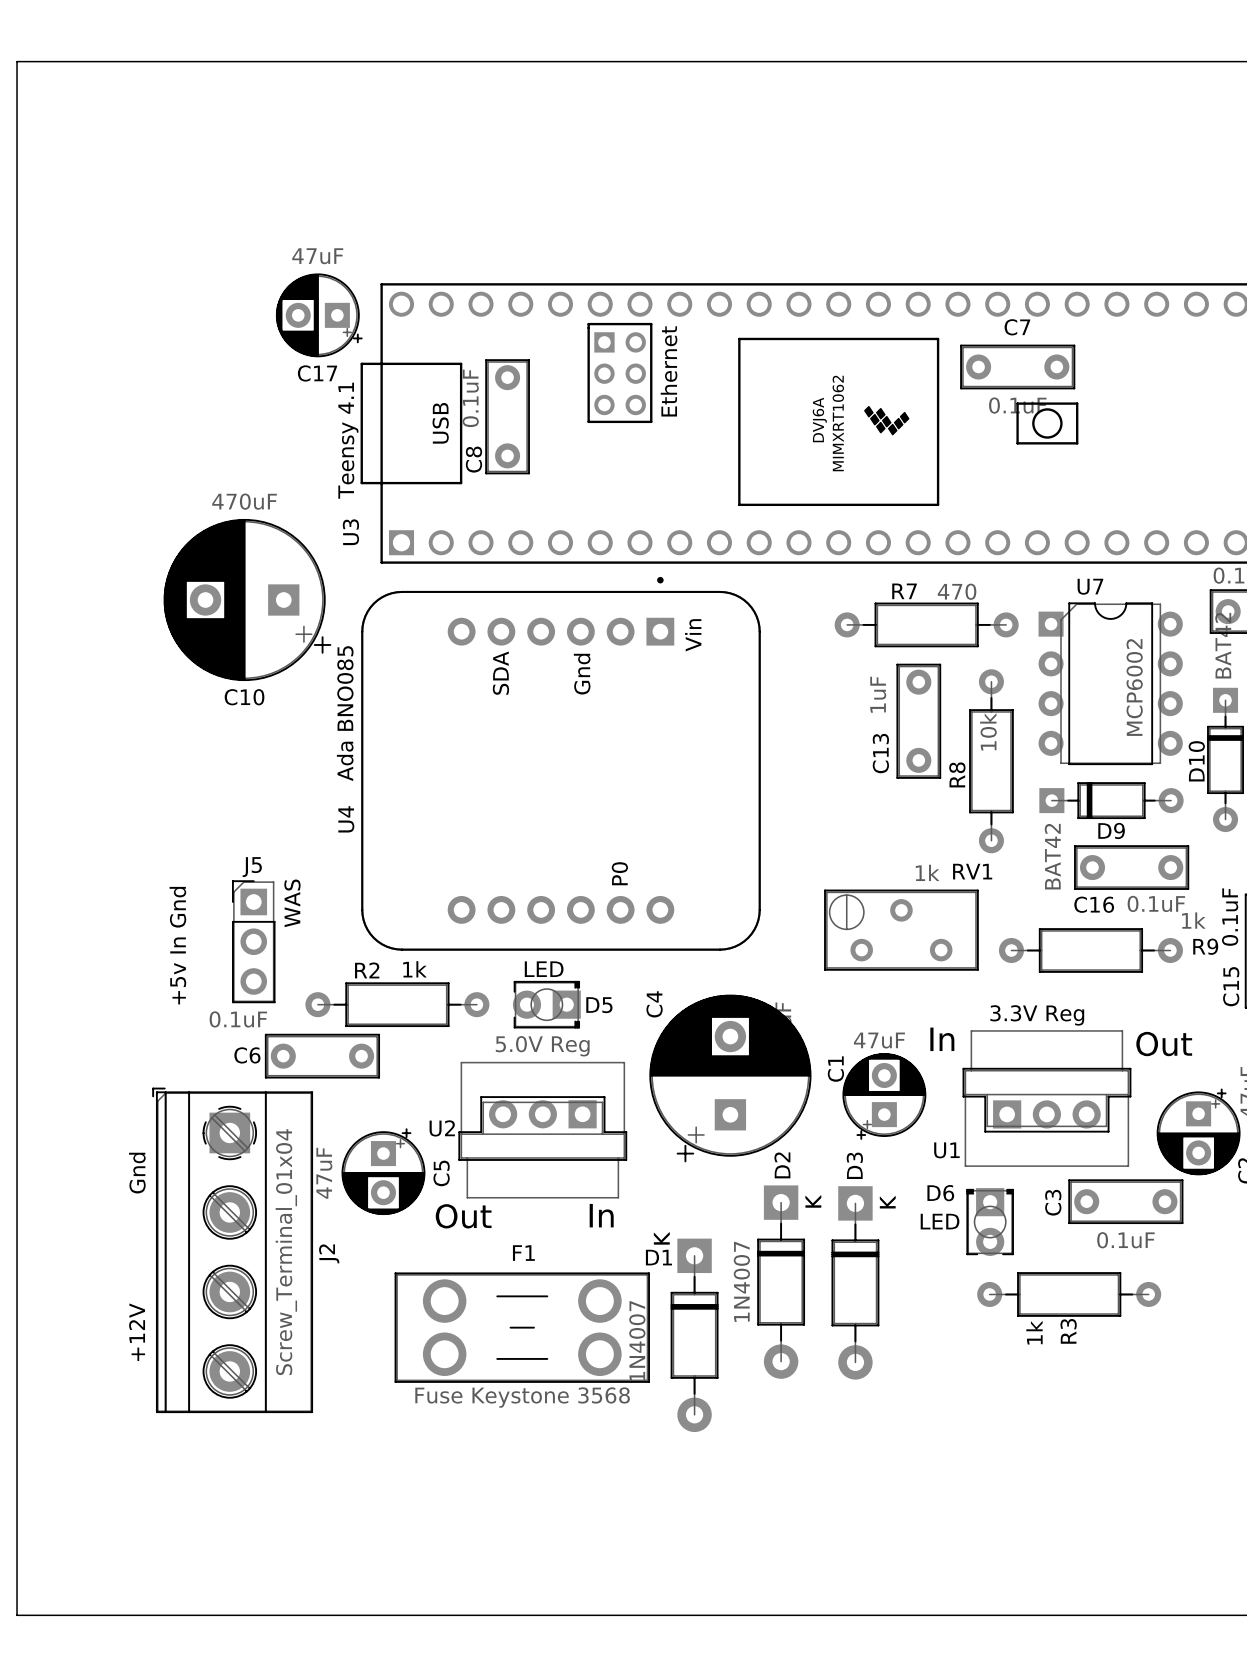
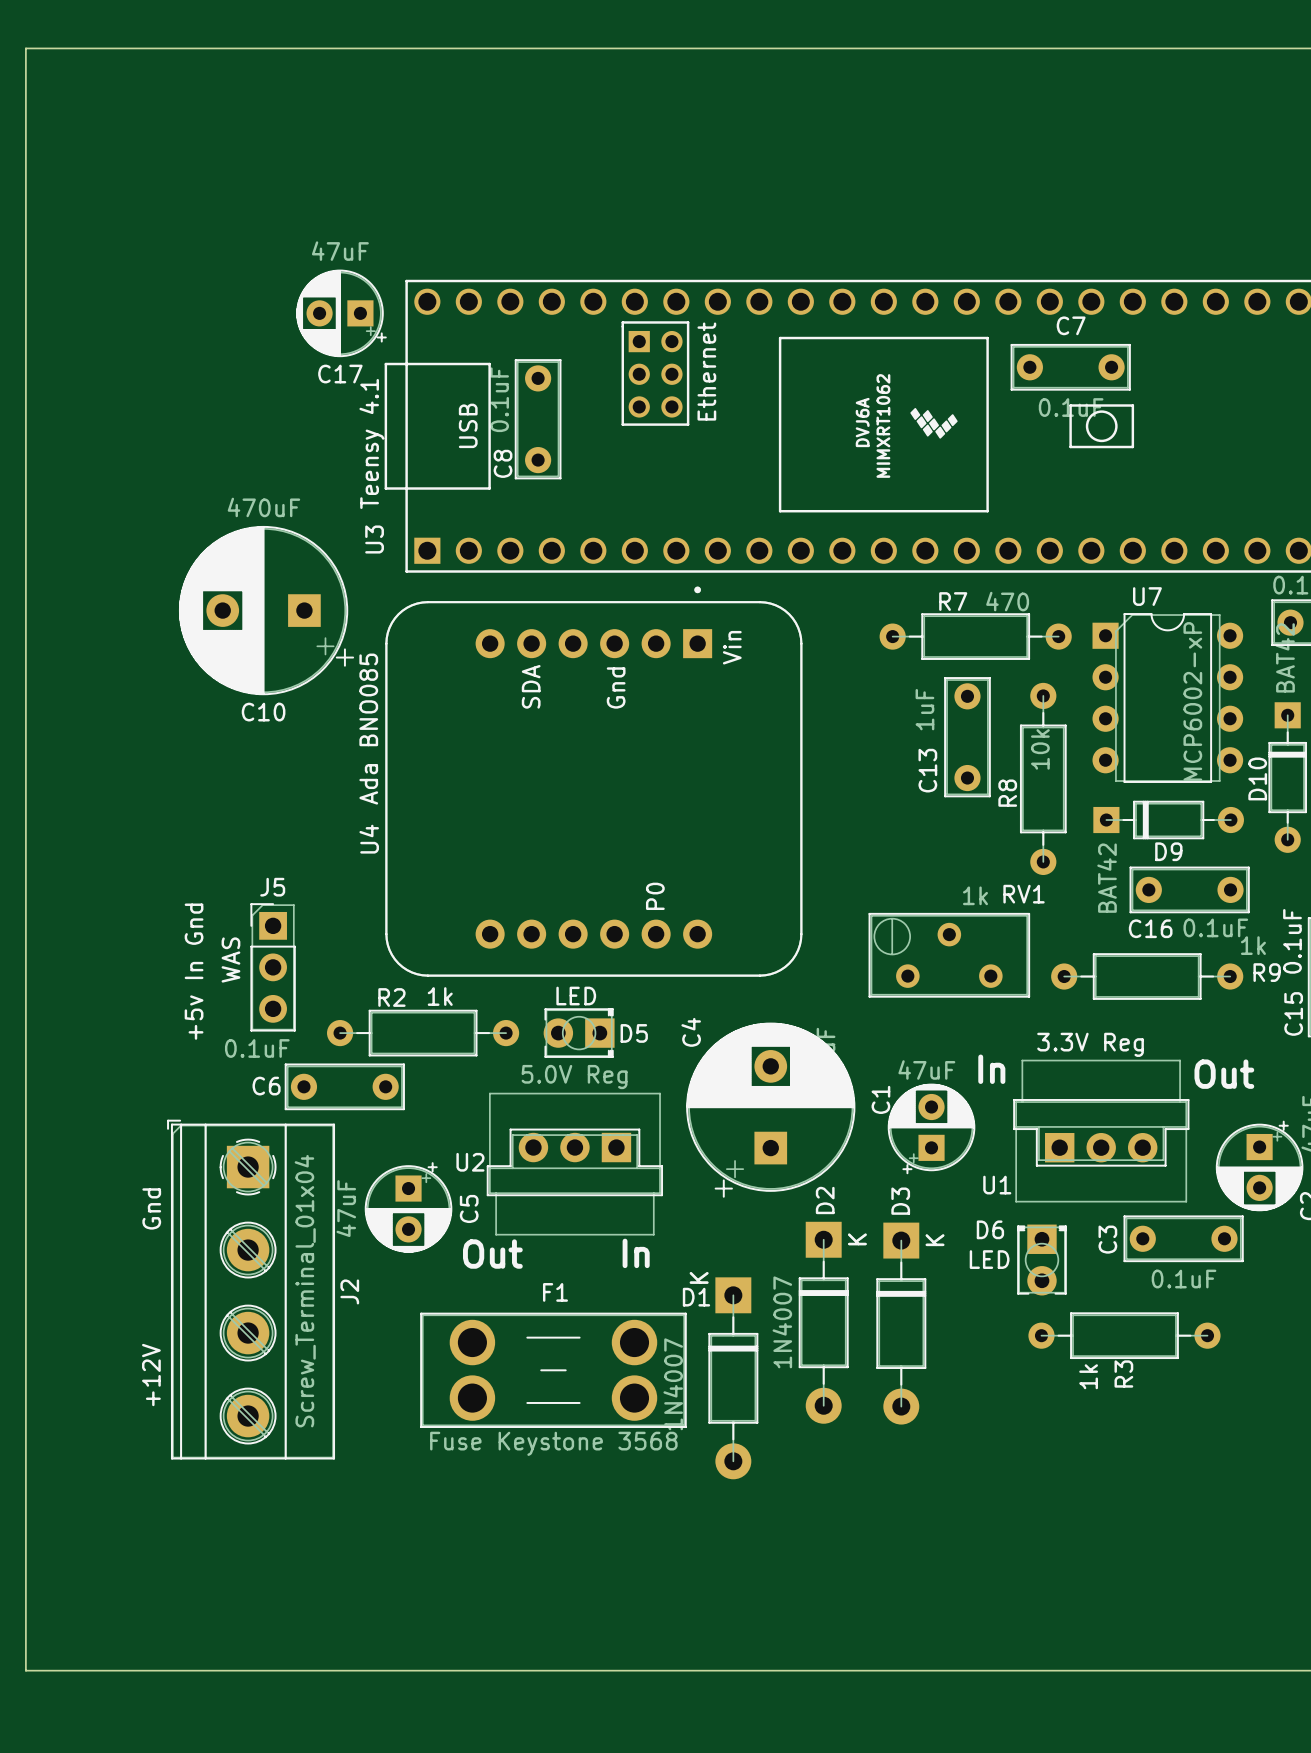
U7 value: MCP6002 (1134, 687) -> MCP6002-xP (1192, 701)
text position: WAS (292, 903) -> WAS (230, 960)

